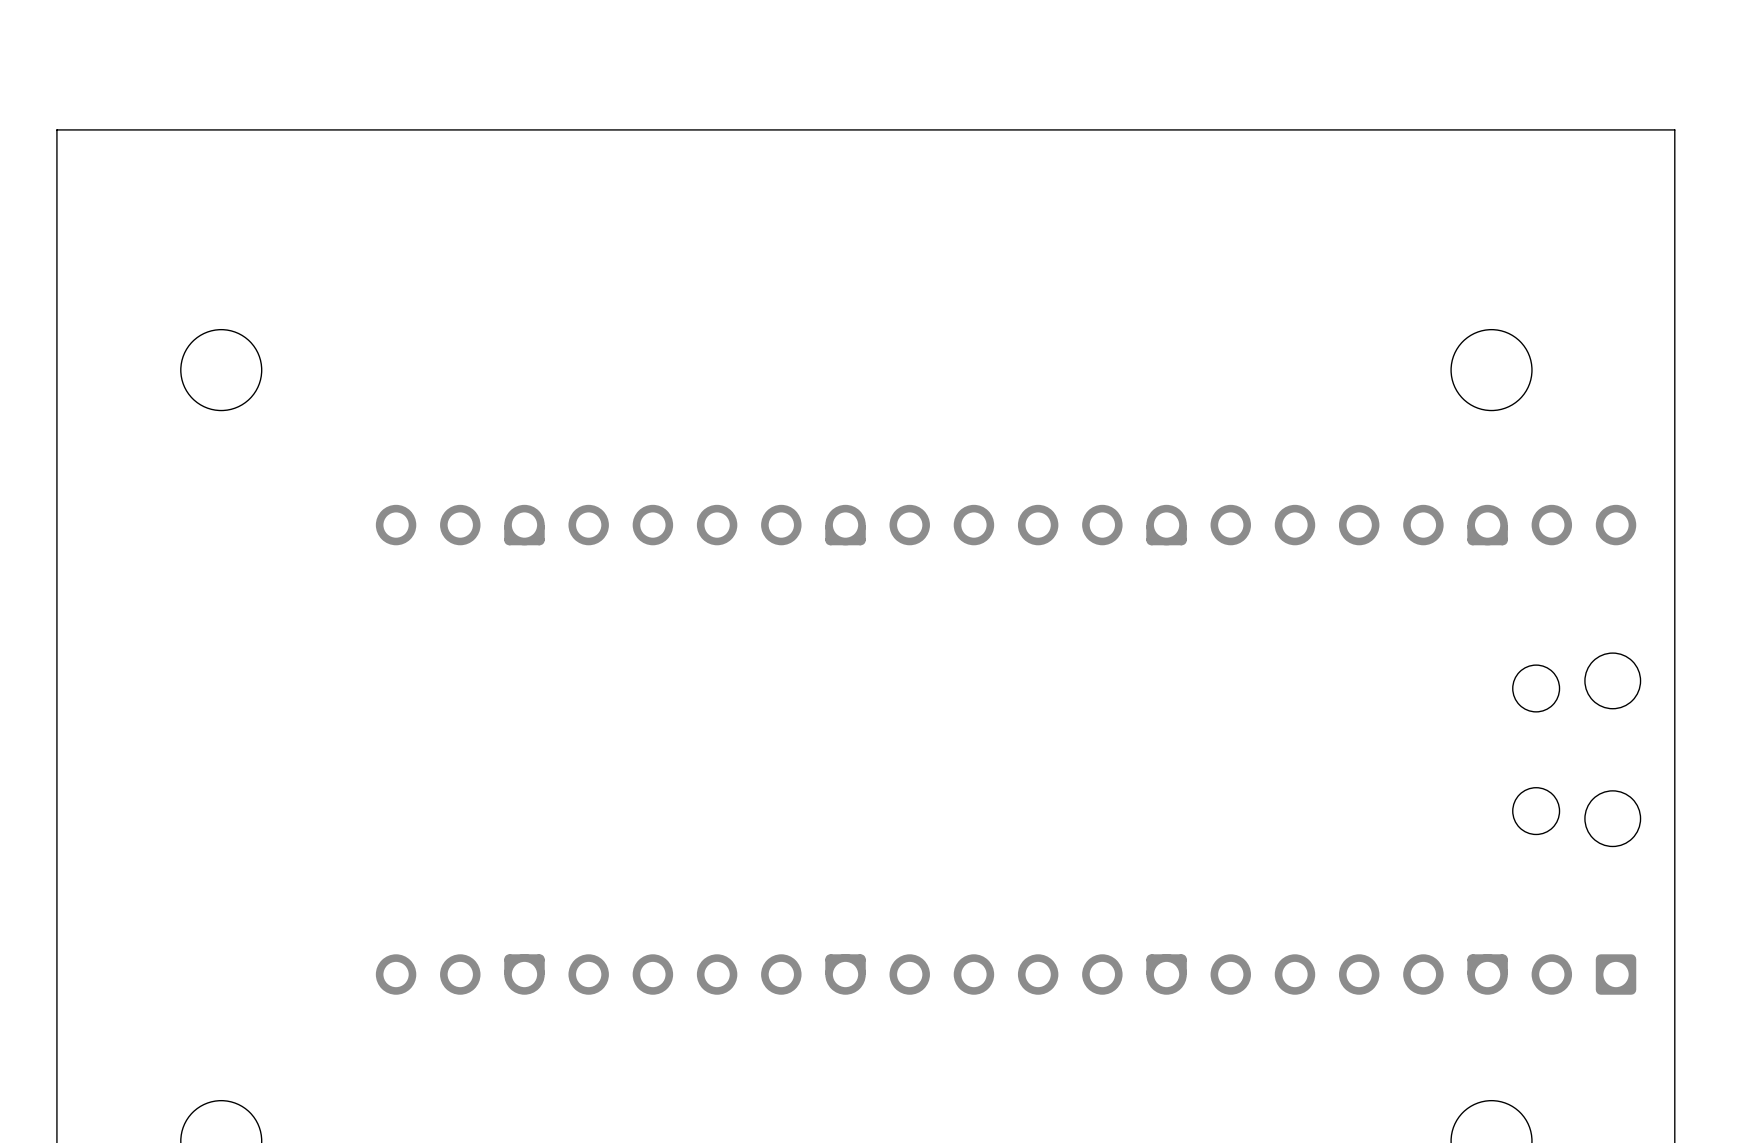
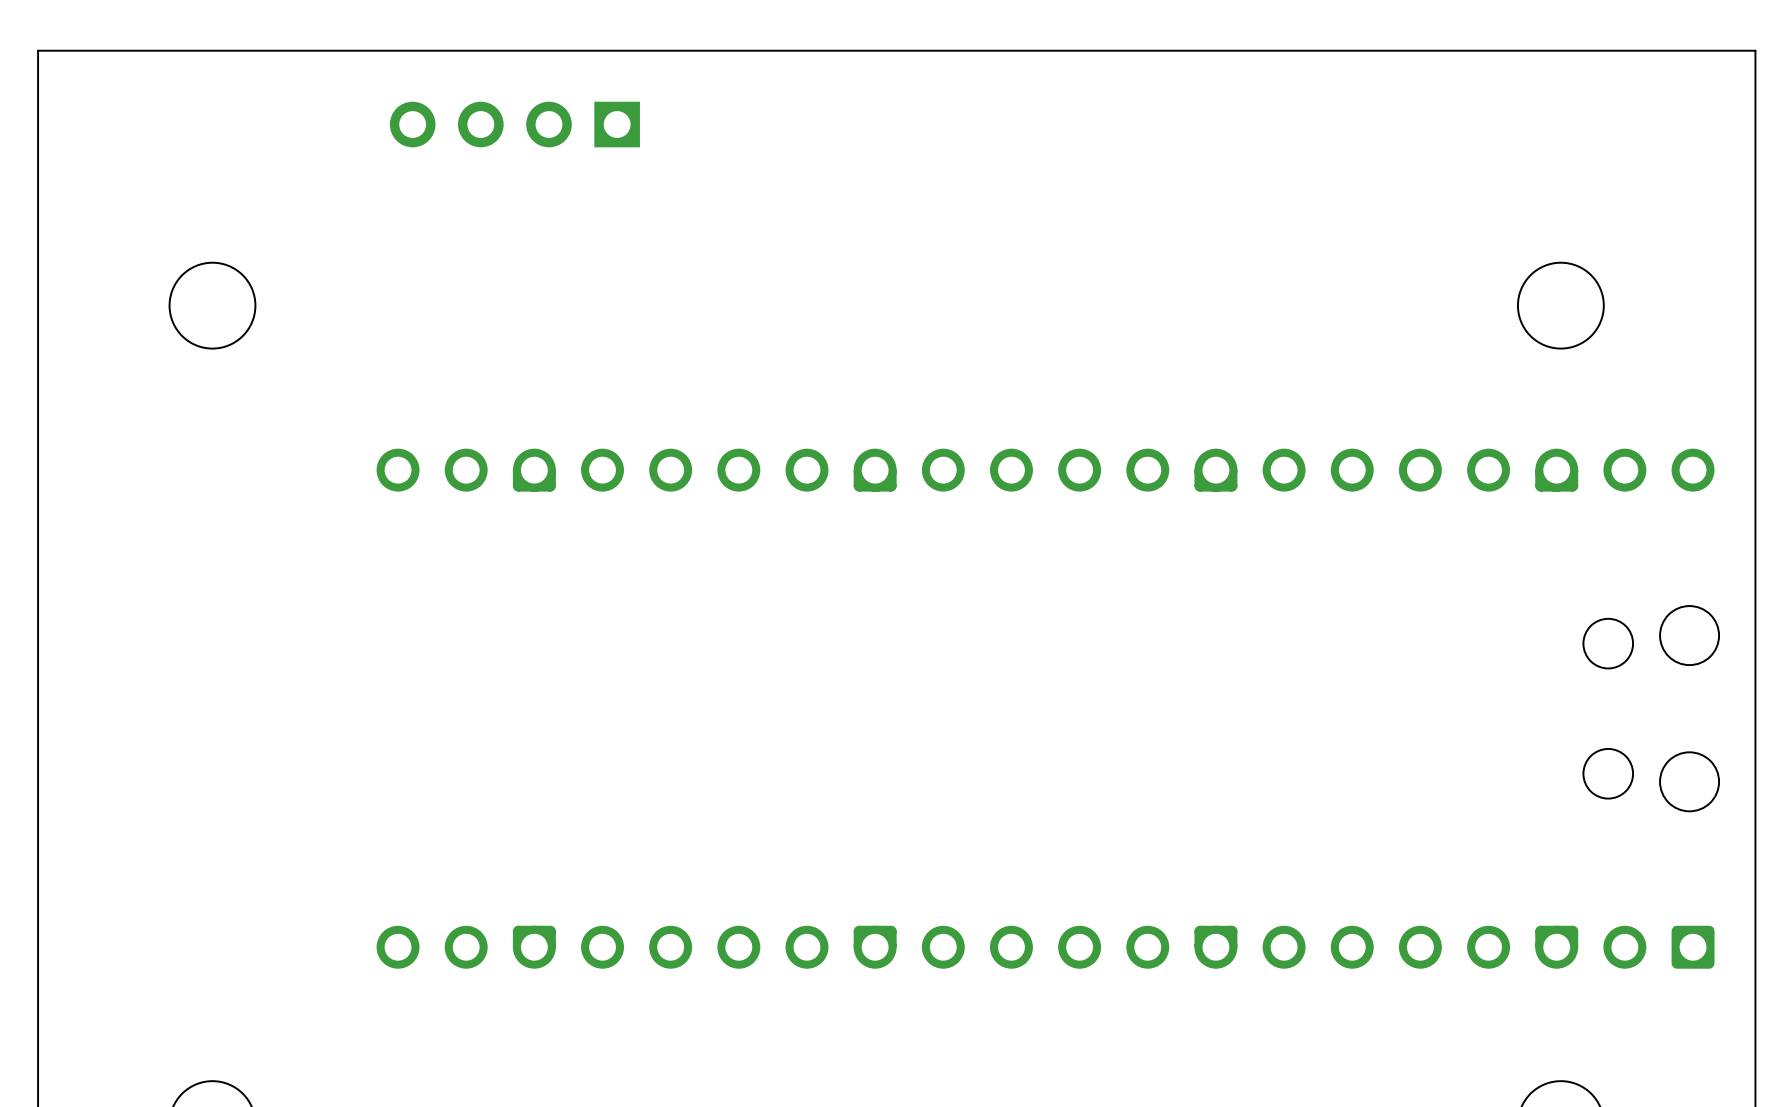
part: none -> (514, 124)

